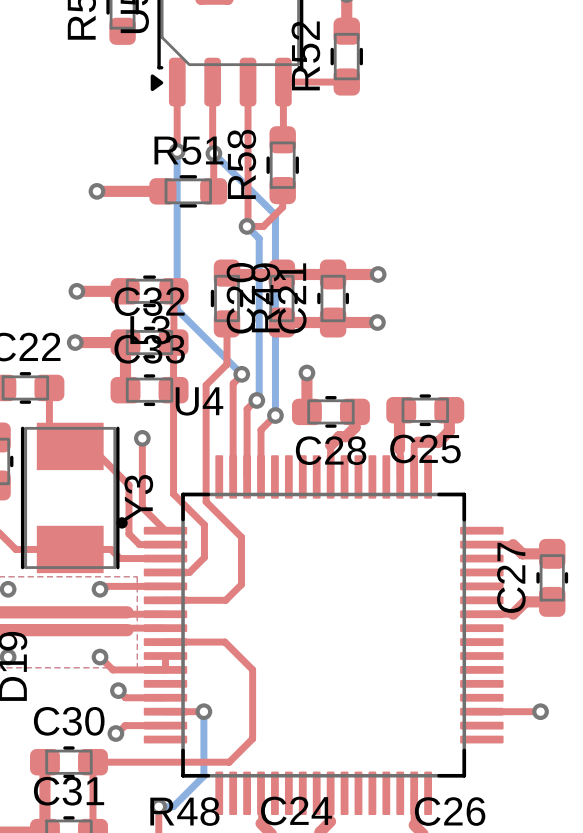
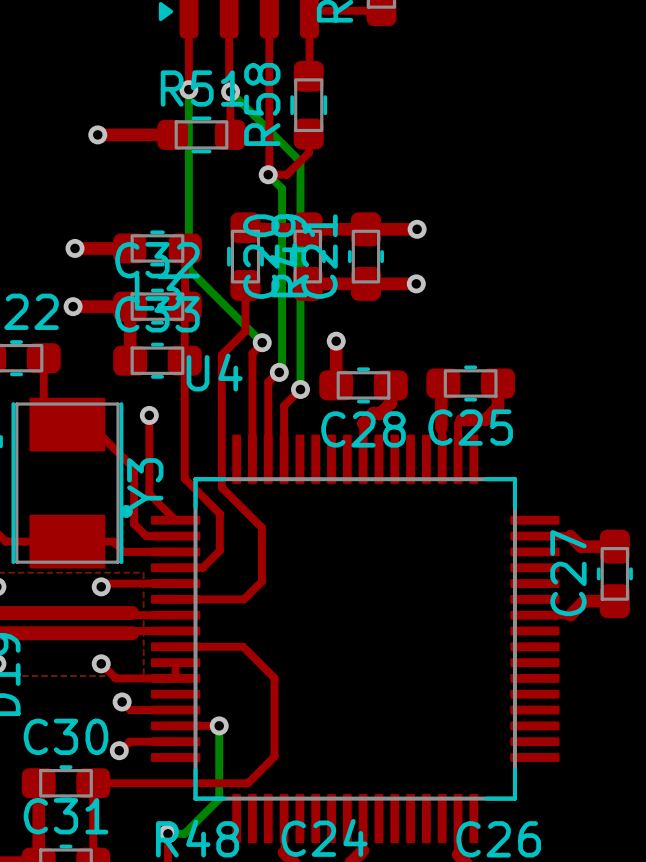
top track: (481, 711) (540, 711) -> none
via: (540, 711) -> none

